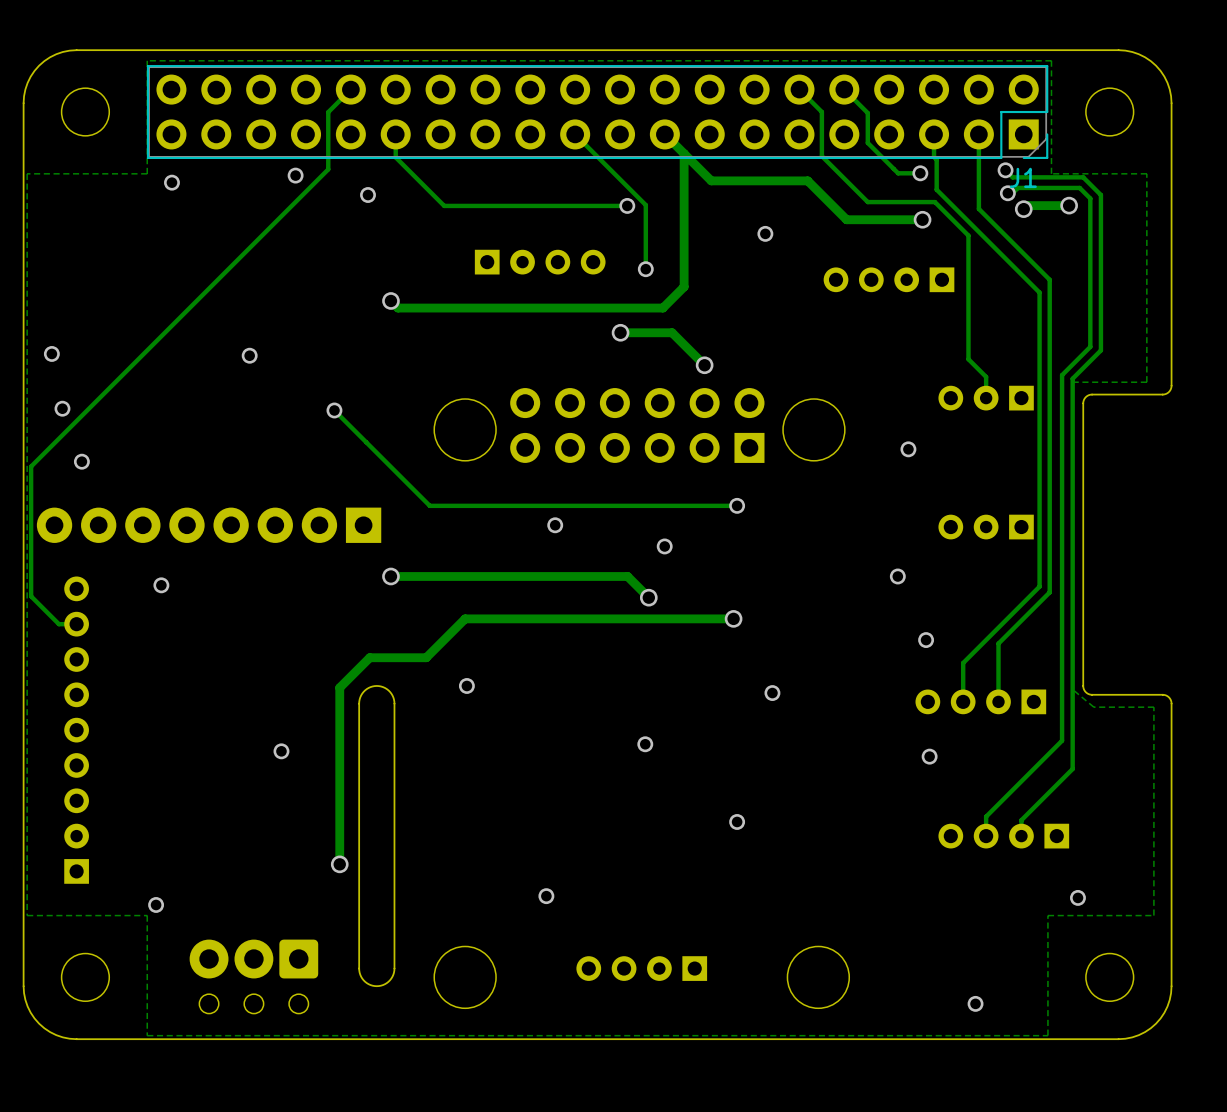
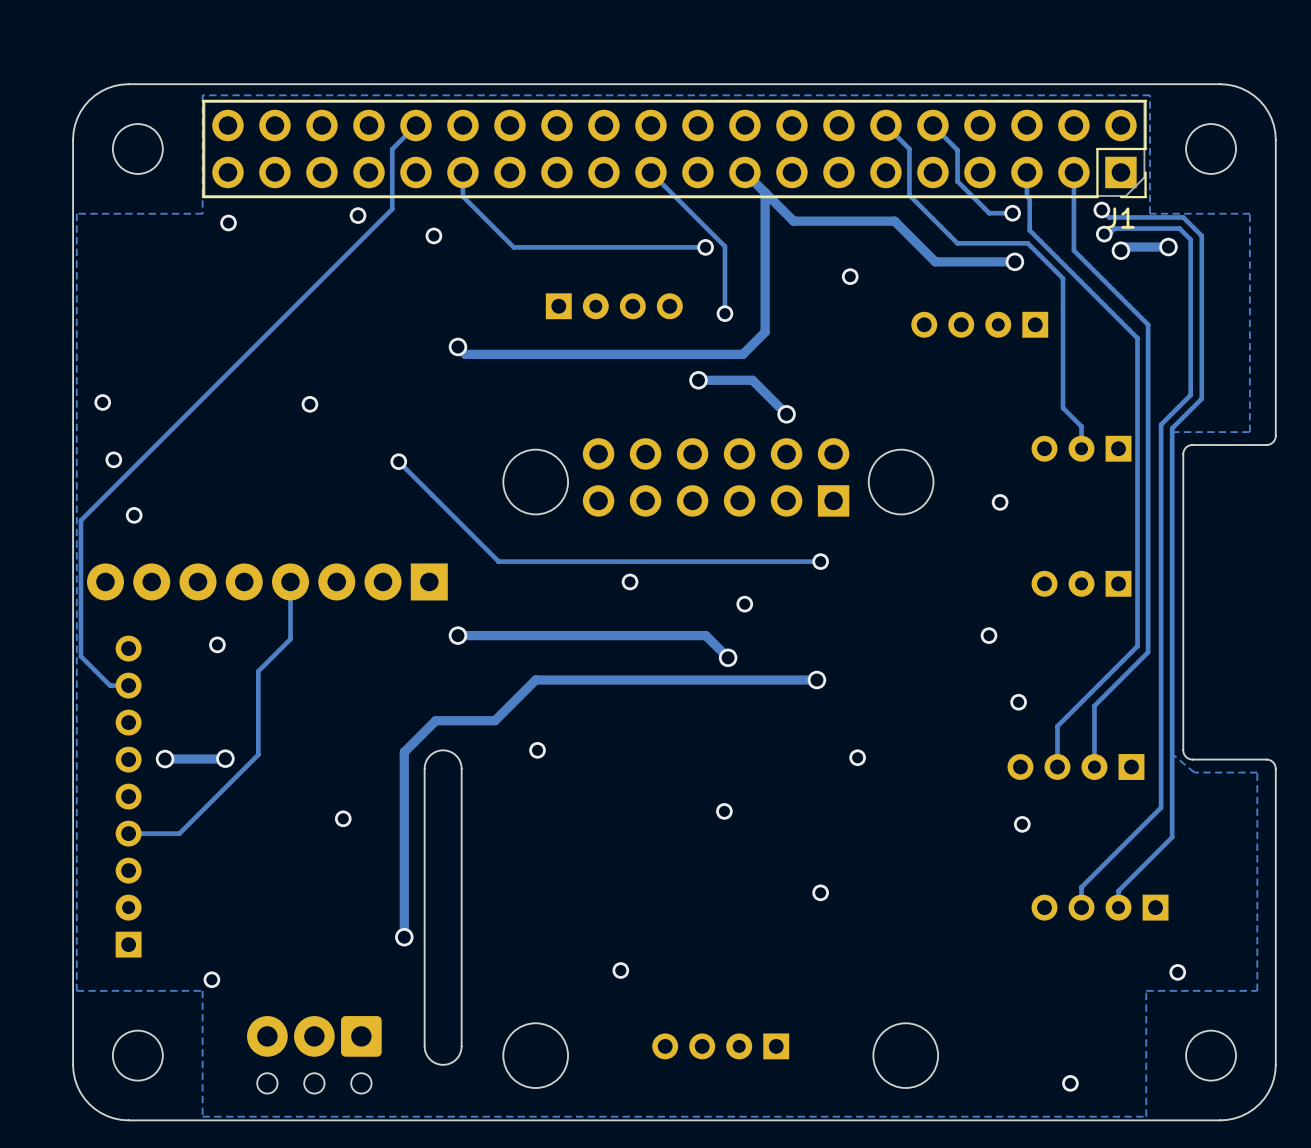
track: none -> (290, 581) (290, 639) (258, 671) (258, 754) (179, 833) (128, 833)
track: none -> (225, 758) (165, 759)
via: none -> (225, 758)
via: none -> (165, 759)

